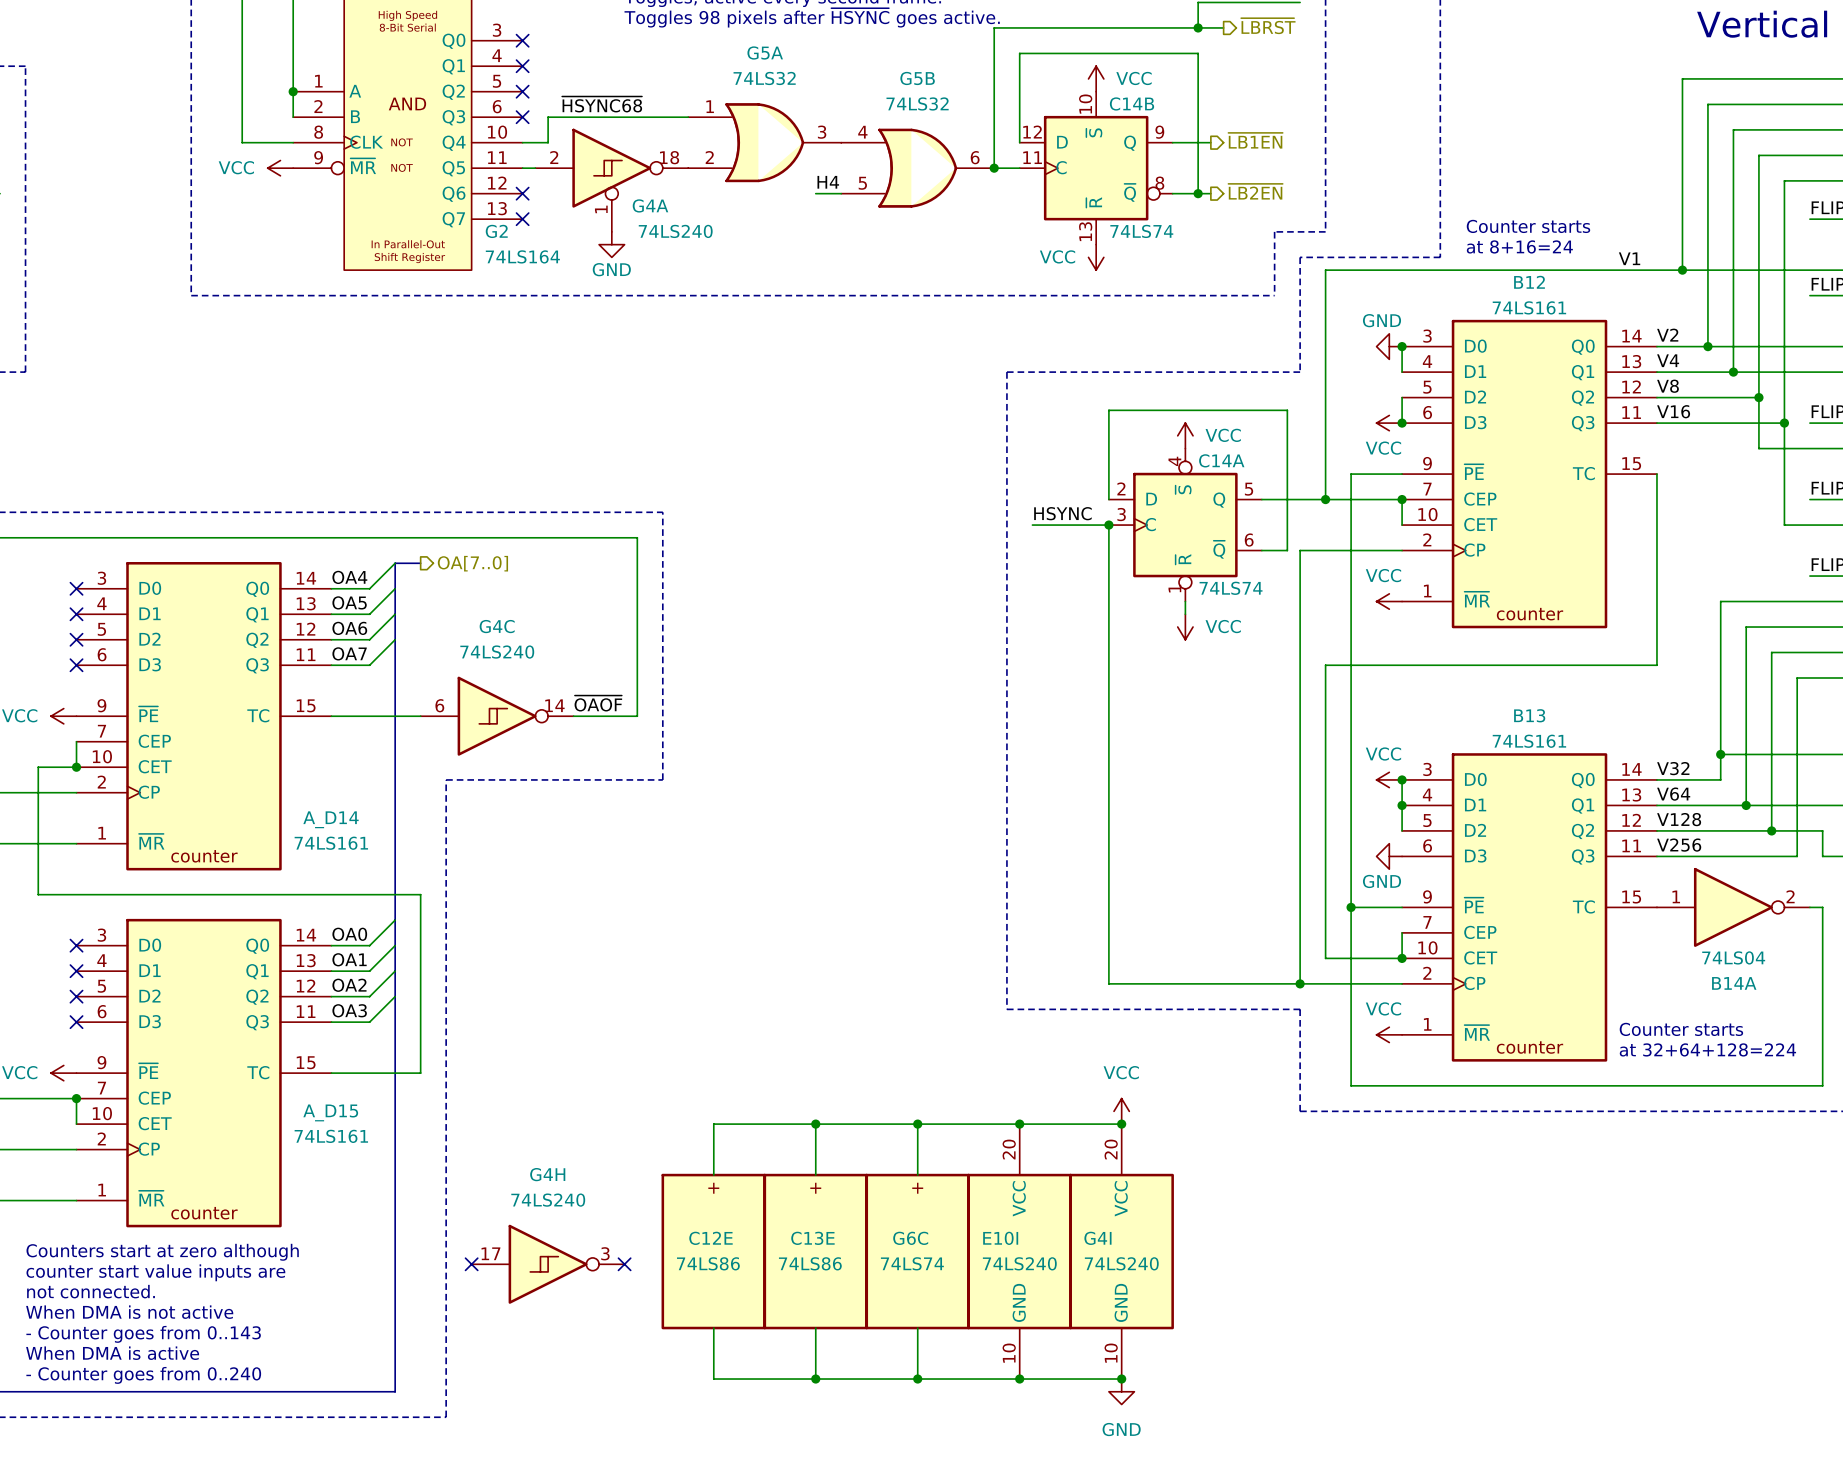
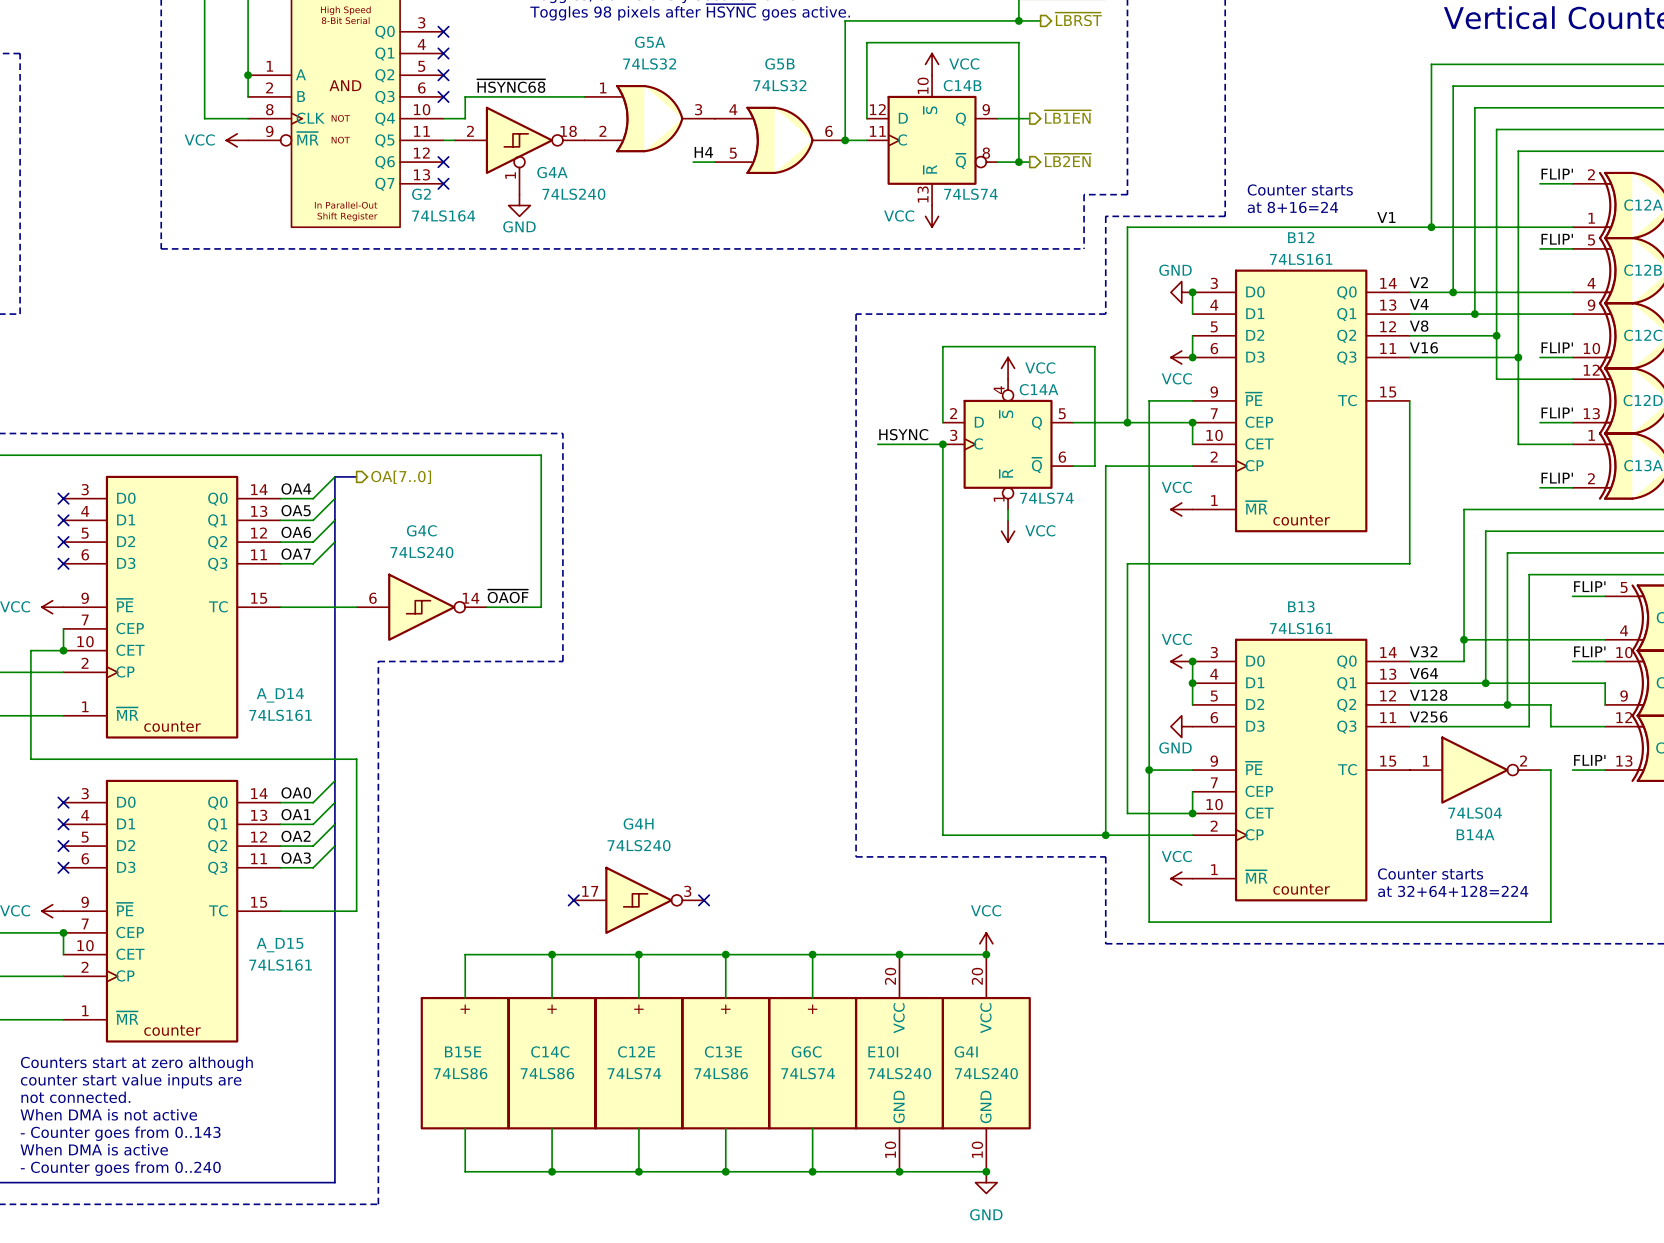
no-connect mark: none -> (573, 900)
no-connect mark: none -> (704, 900)
power symbol position: VCC (1121, 1111) -> VCC (986, 943)
wire: none -> (552, 954) (552, 998)
junction: none -> (552, 954)
wire: (713, 1124) (713, 1175) -> (606, 954) (465, 954) (465, 998)
wire: none -> (638, 954) (638, 998)
junction: none -> (638, 954)
wire: (815, 1124) (815, 1175) -> (725, 954) (725, 998)
junction: (815, 1124) -> none
junction: none -> (725, 954)
wire: (917, 1124) (917, 1175) -> (812, 954) (812, 998)
junction: (917, 1124) -> none
junction: none -> (812, 954)
junction: (1019, 1124) -> none
junction: none -> (899, 954)
wire: none -> (953, 954) (986, 954)
junction: (1121, 1124) -> none
junction: none -> (986, 954)
B15E: none -> 74LS86 (465, 1063)
C14C: none -> 74LS74 (552, 1063)
C12E position: (713, 1251) -> (638, 1063)
C13E position: (815, 1251) -> (725, 1063)
G6C position: (917, 1251) -> (812, 1063)
E10I position: (1019, 1251) -> (899, 1063)
G4I position: (1121, 1251) -> (986, 1063)
C12E value position: 74LS86 (708, 1263) -> 74LS86 (460, 1073)
no-connect mark: (471, 1264) -> none
G4H position: (548, 1264) -> (638, 900)
no-connect mark: (624, 1264) -> none
wire: none -> (552, 1128) (552, 1171)
wire: (713, 1328) (713, 1379) -> (465, 1128) (465, 1171) (606, 1171)
wire: none -> (638, 1128) (638, 1171)
wire: (815, 1328) (815, 1379) -> (725, 1128) (725, 1171)
wire: (917, 1328) (917, 1379) -> (812, 1128) (812, 1171)
junction: none -> (552, 1171)
junction: none -> (638, 1171)
junction: (815, 1379) -> none
junction: none -> (725, 1171)
junction: (917, 1379) -> none
junction: none -> (812, 1171)
junction: (1019, 1379) -> none
junction: none -> (899, 1171)
wire: none -> (953, 1171) (986, 1171)
junction: (1121, 1379) -> none
junction: none -> (986, 1171)
power symbol position: GND (1121, 1391) -> GND (986, 1182)

